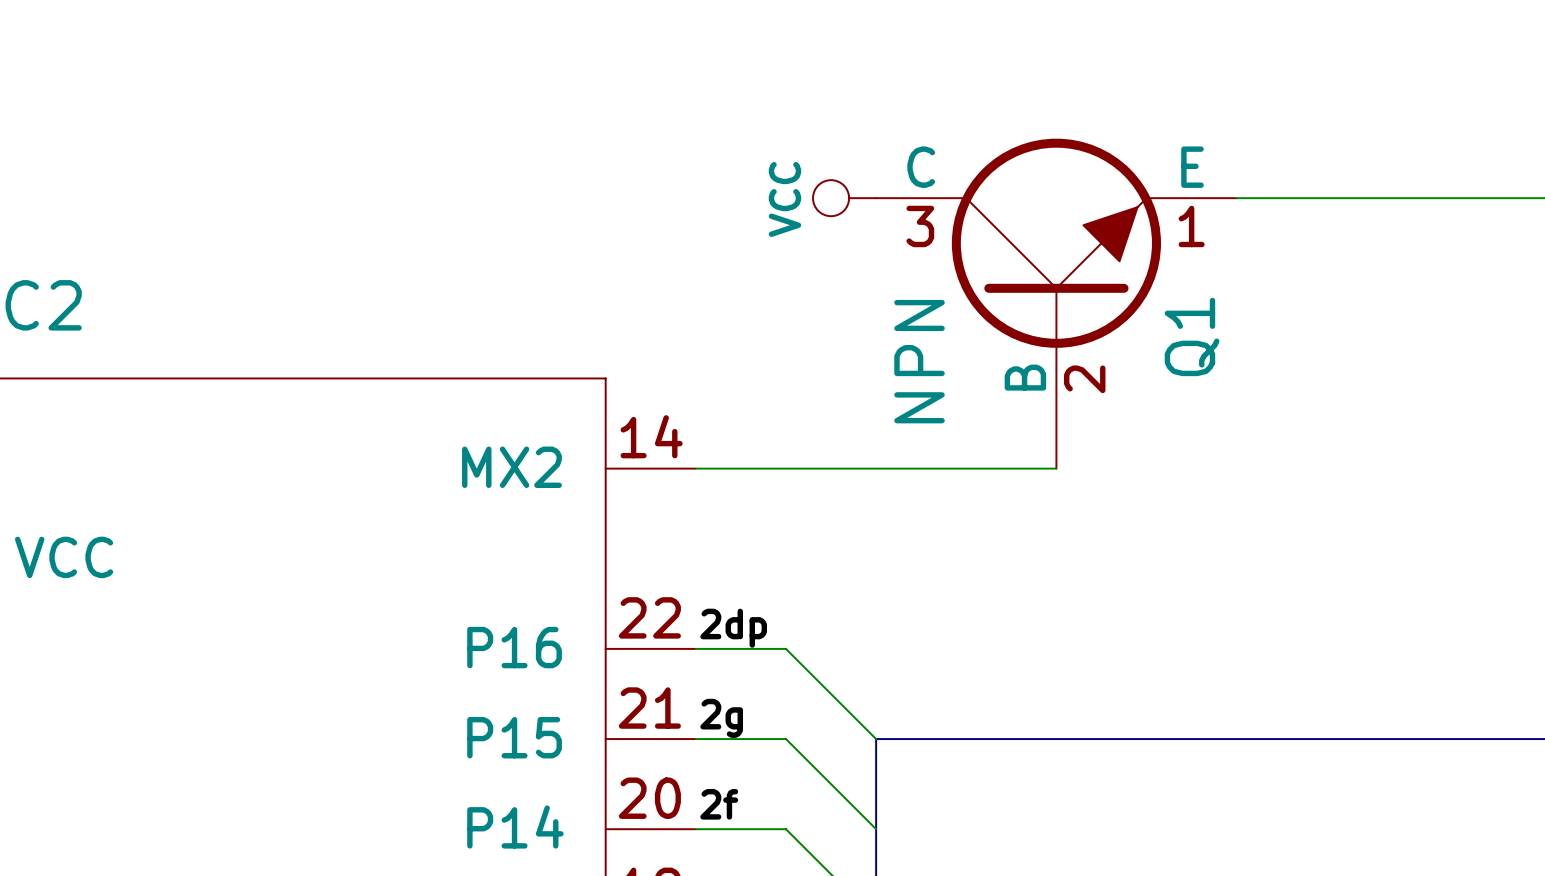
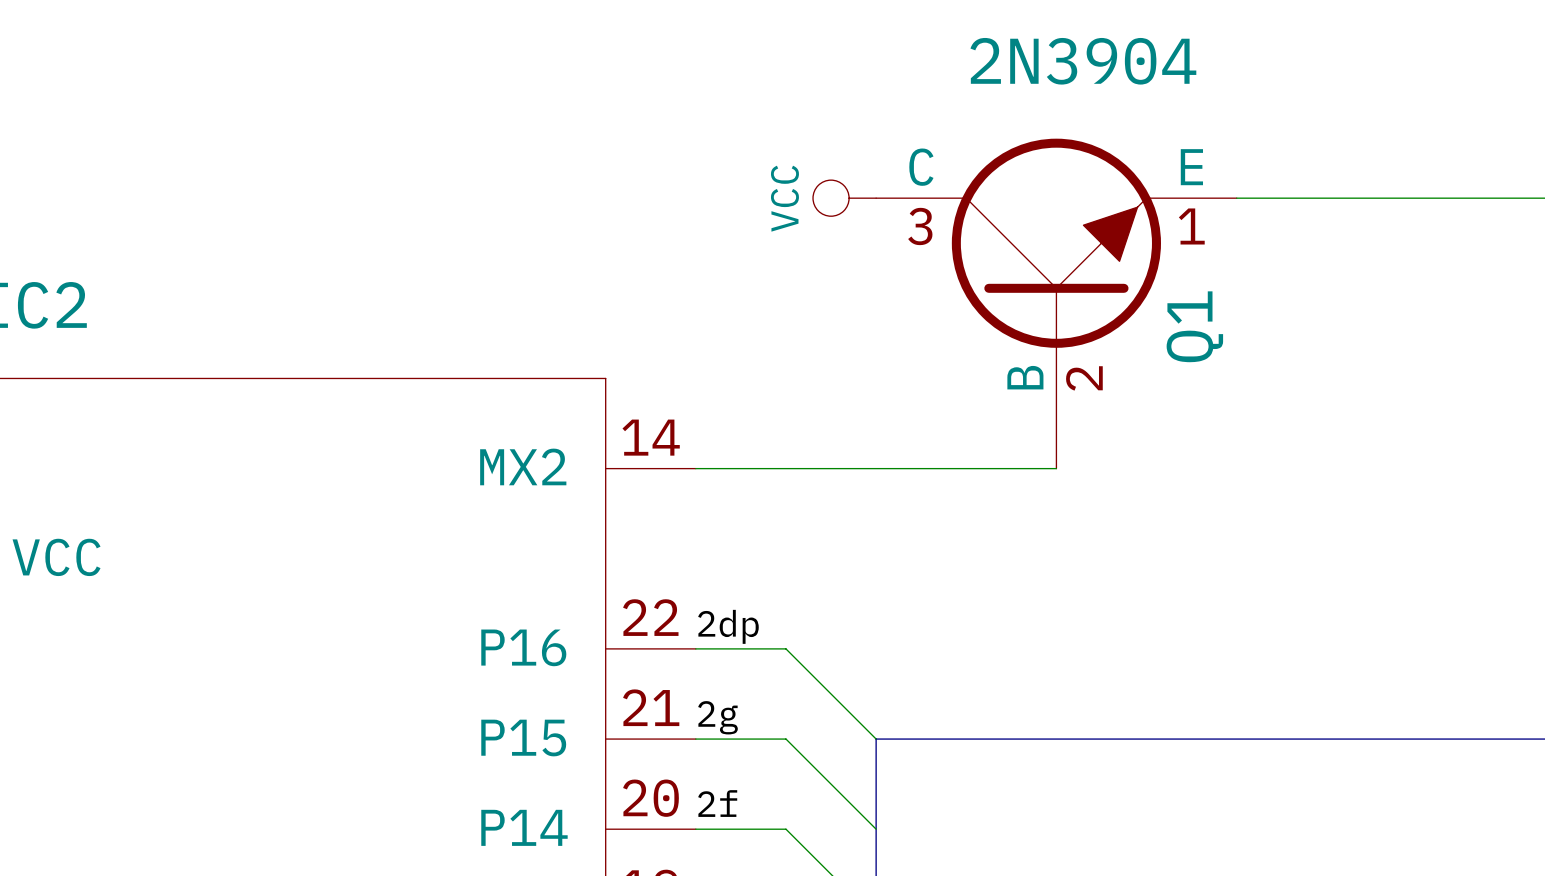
Q1 value: NPN (919, 361) -> 2N3904 (1083, 61)

